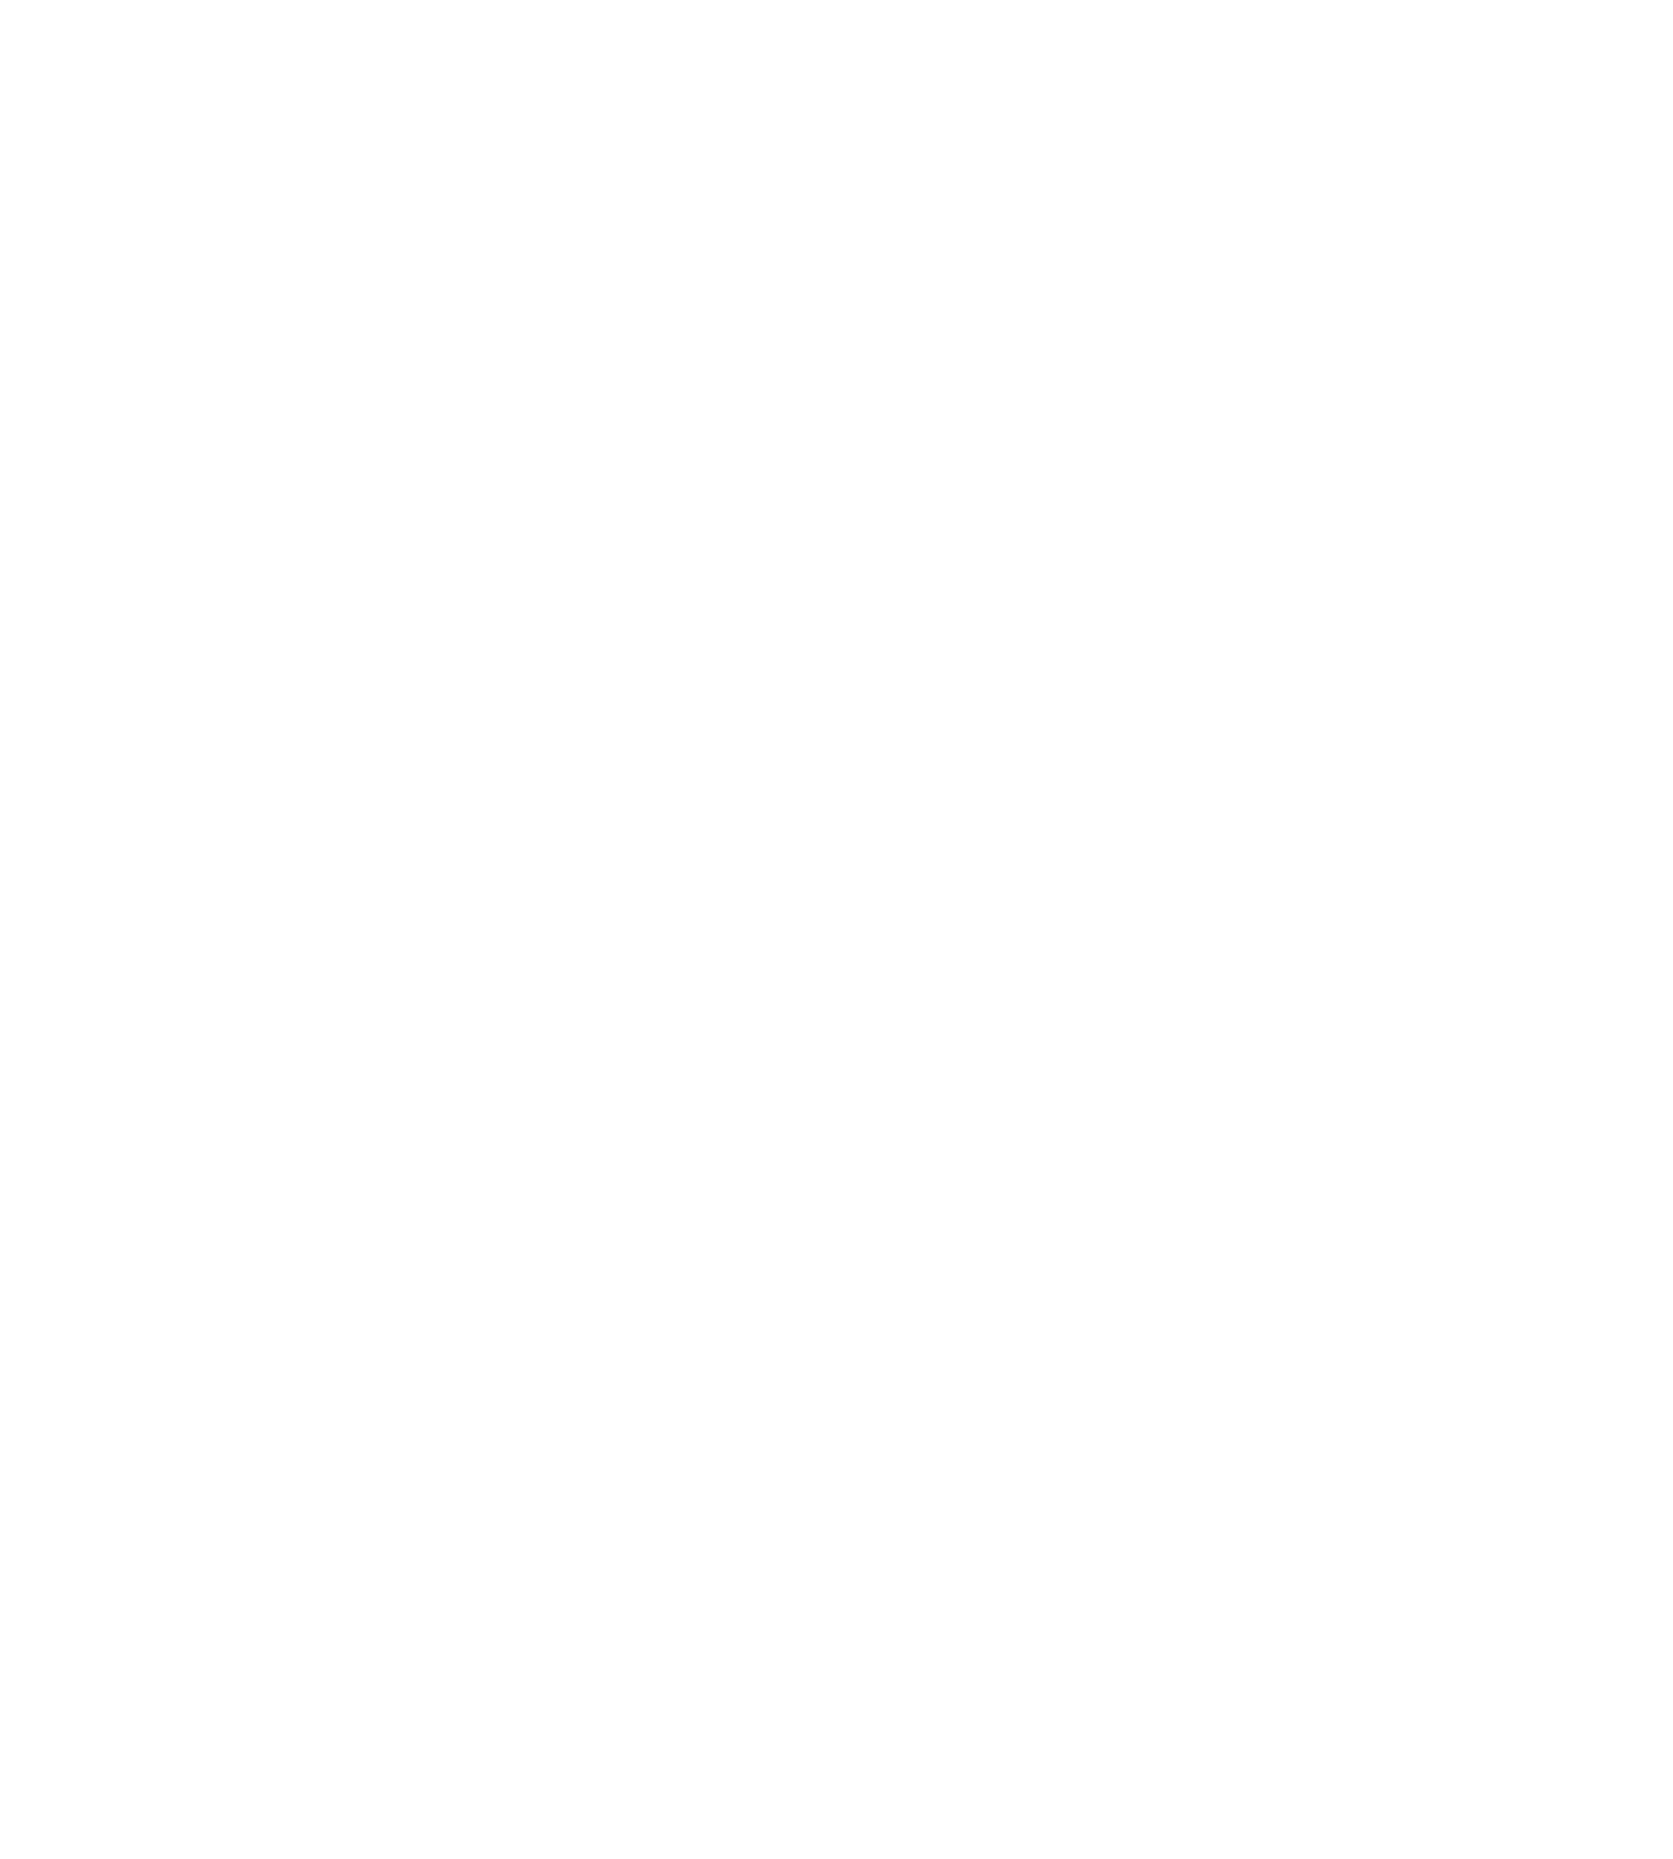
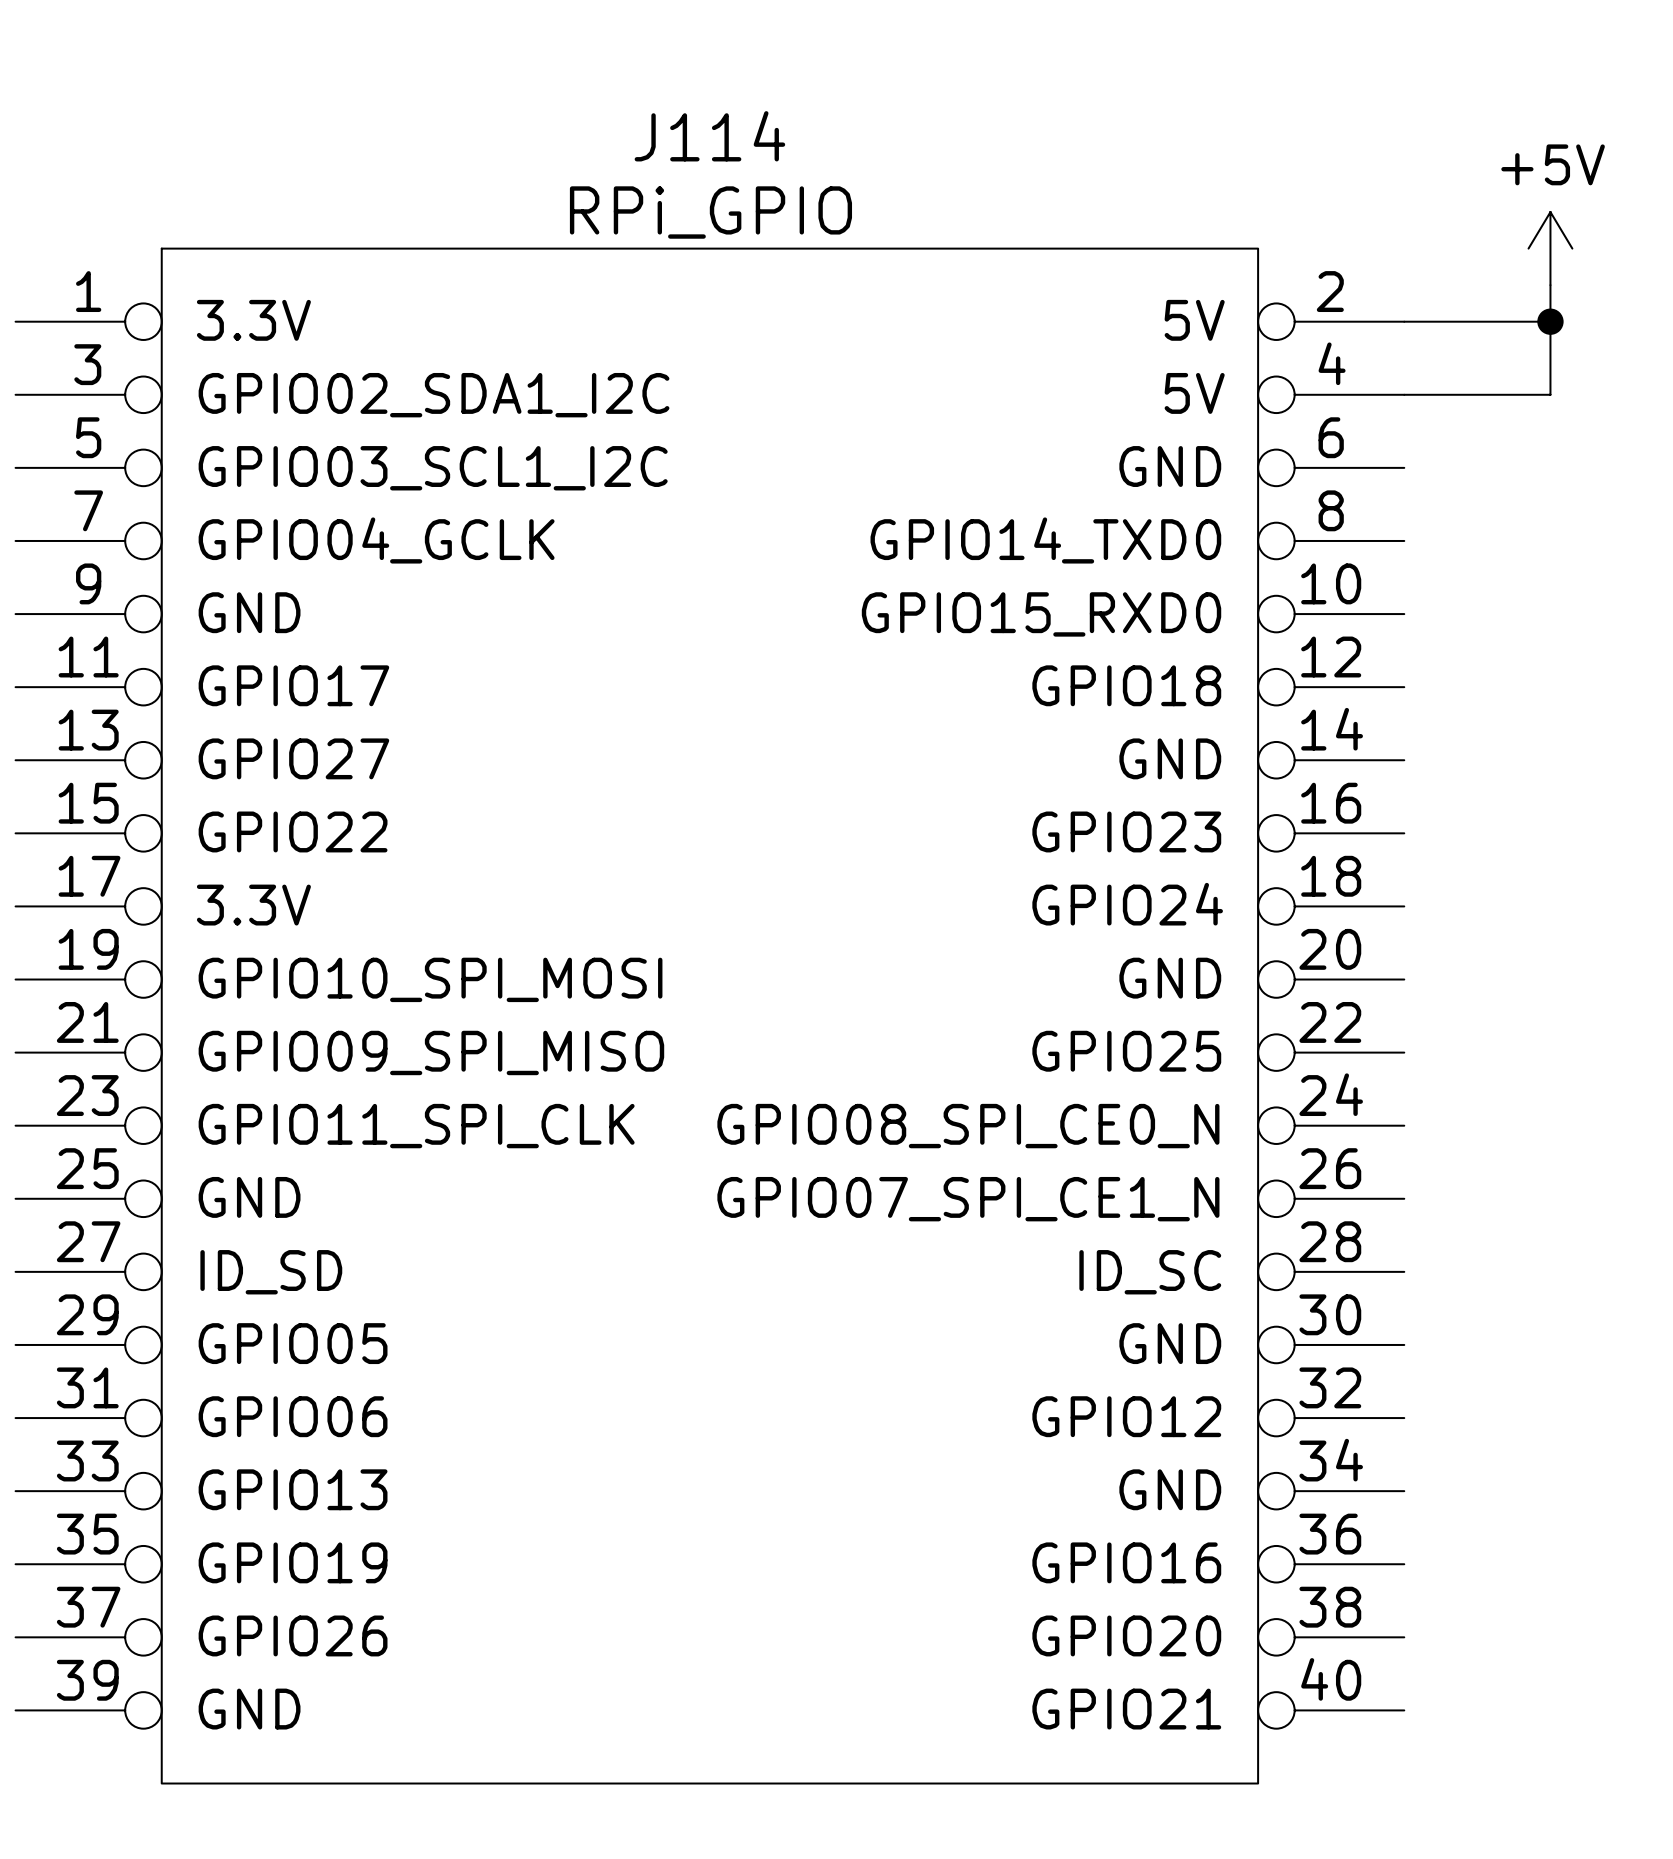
power symbol: none -> +5V (1550, 248)
wire: none -> (1550, 285) (1550, 394) (1404, 394)
wire: none -> (1404, 321) (1550, 321)
junction: none -> (1550, 321)
J114: none -> RPi_GPIO (709, 1016)

